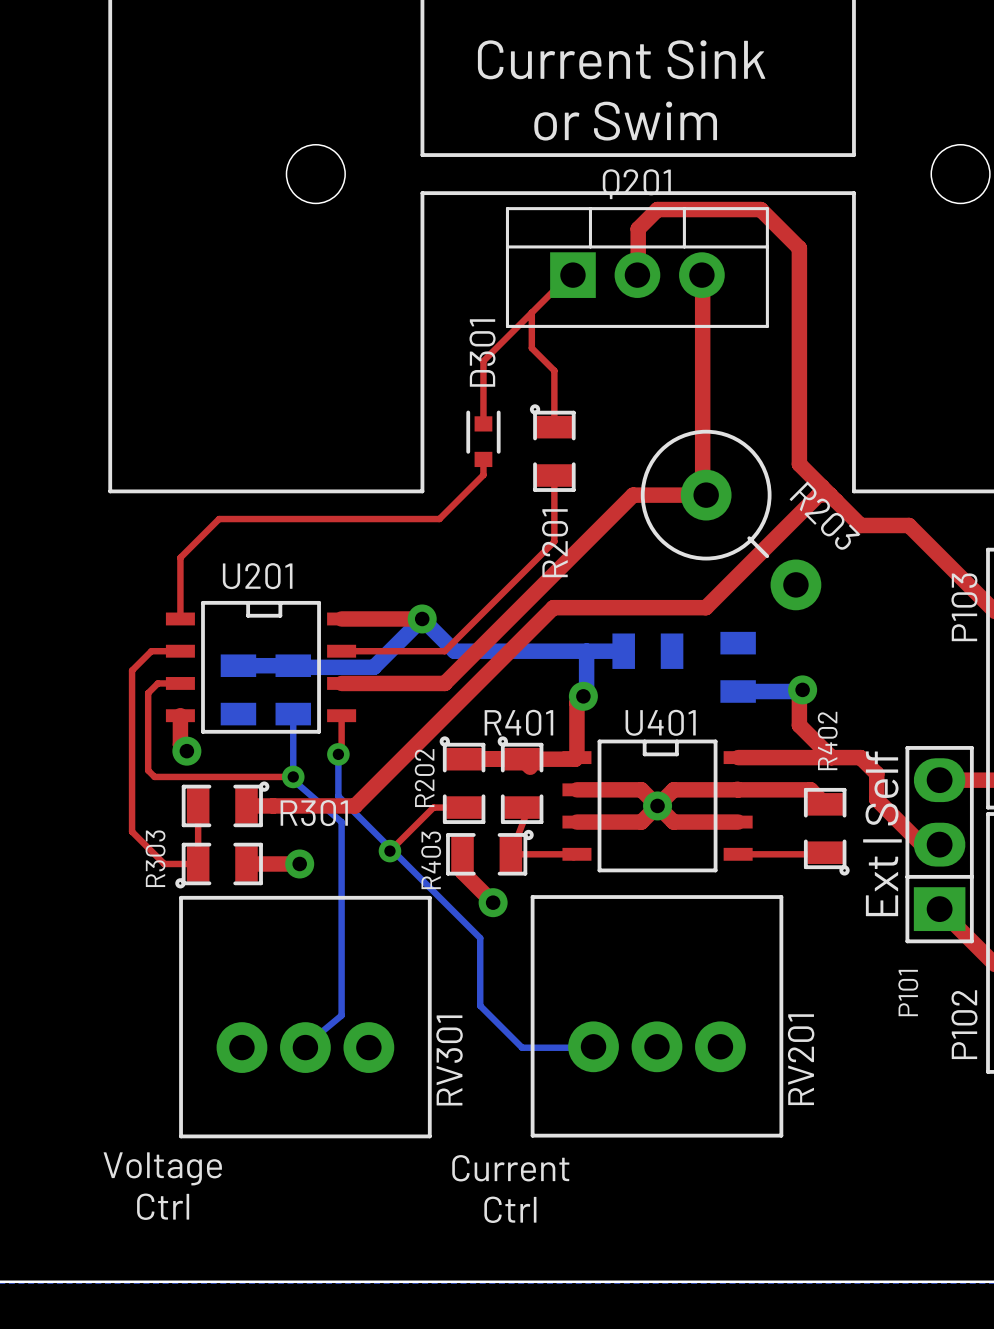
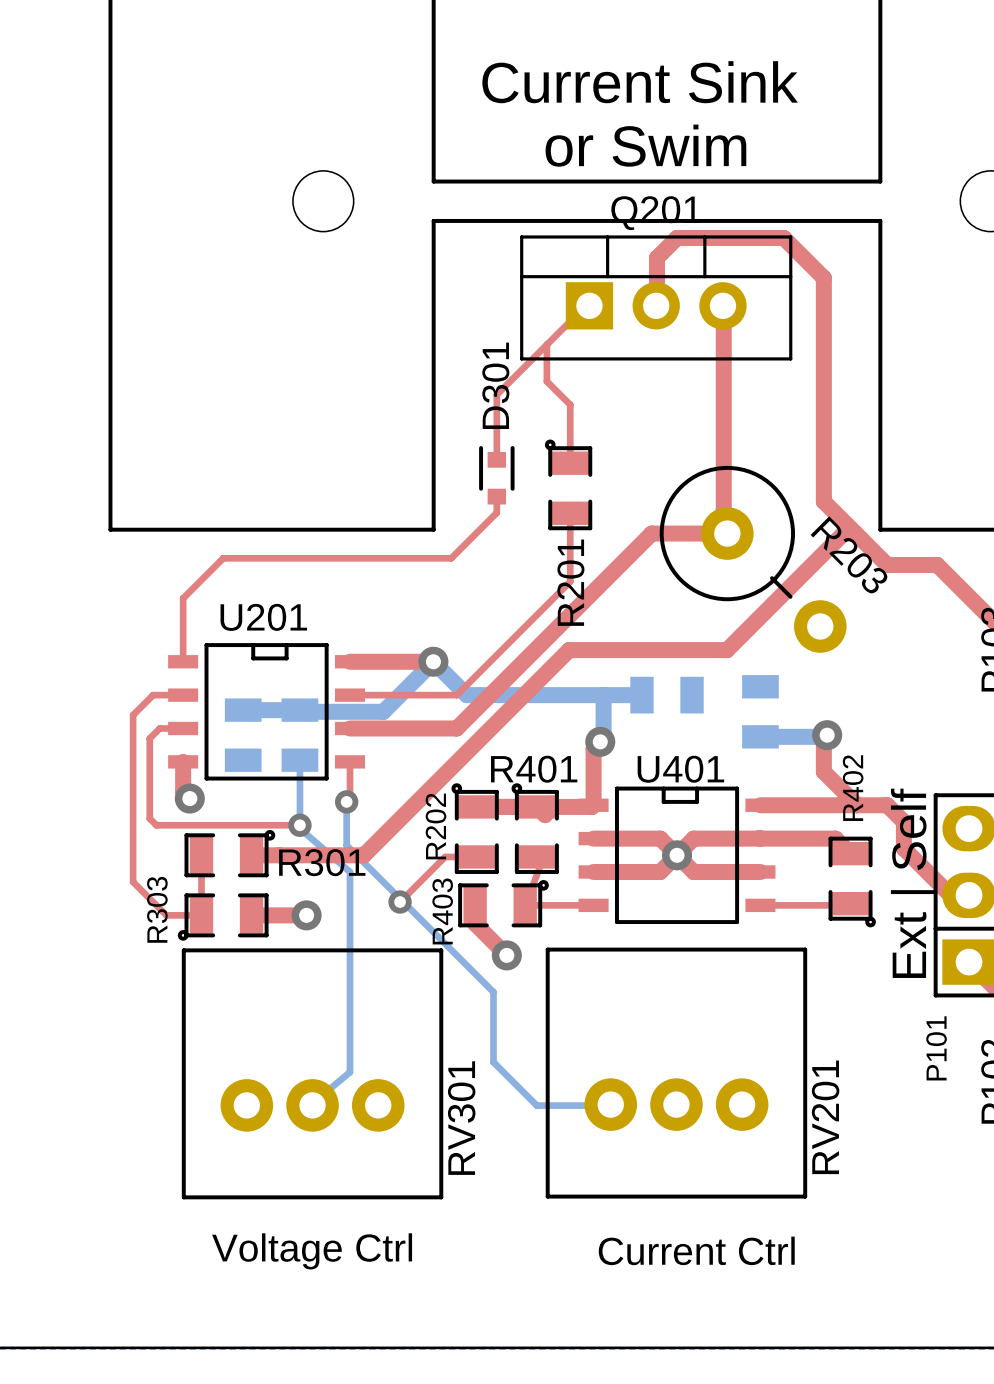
text: Voltage (162, 1168) -> Voltage Ctrl (312, 1251)
text: Current (510, 1168) -> Current Ctrl (696, 1250)
text: Ctrl (163, 1206) -> none
text: Ctrl (510, 1209) -> none

